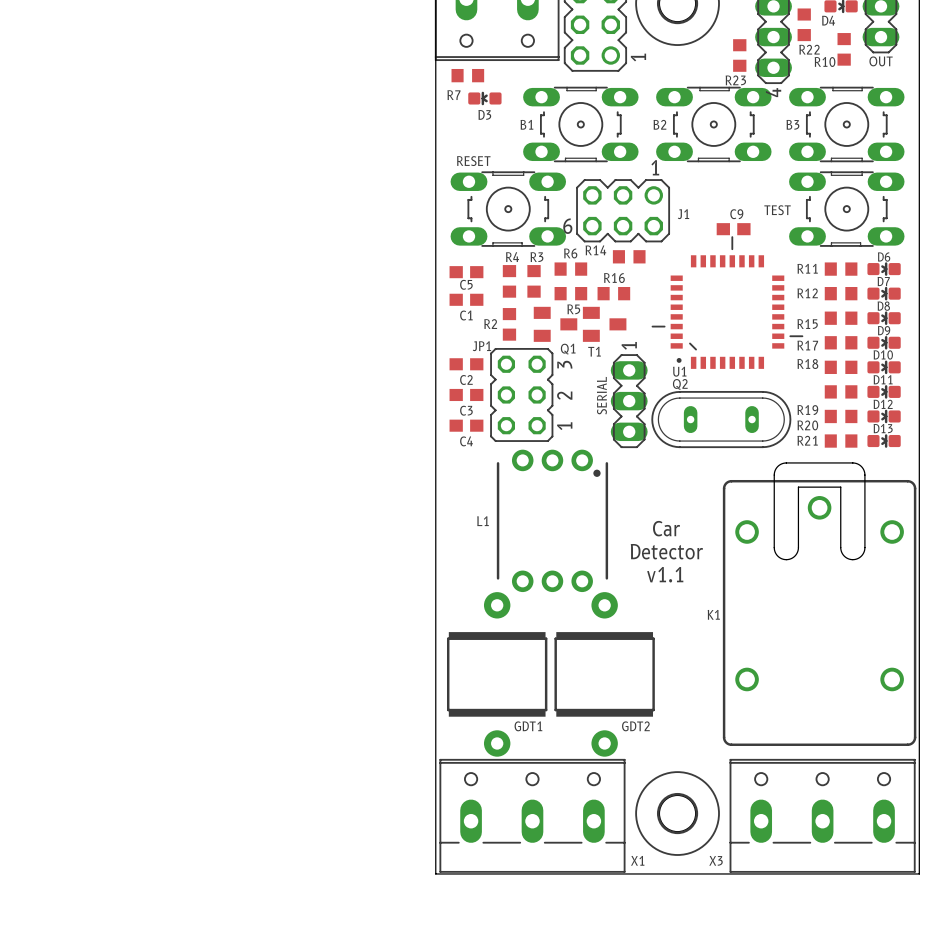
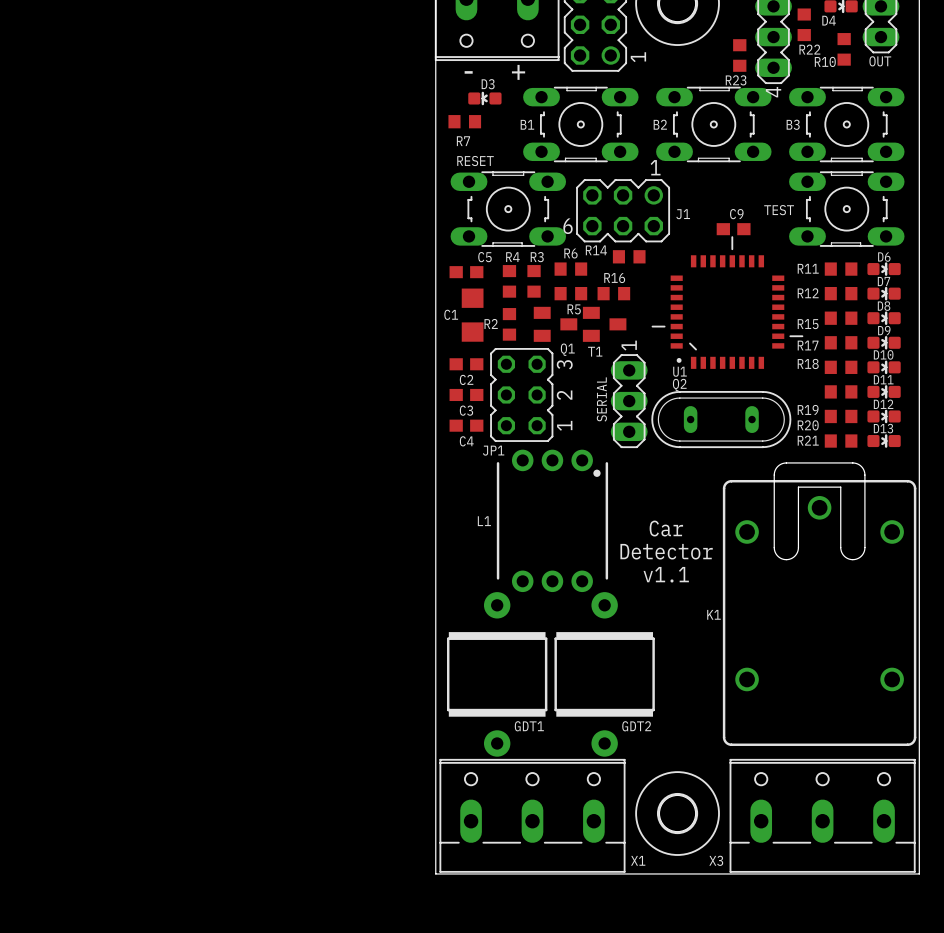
text: none -> - + (494, 72)
R7 position: (467, 75) -> (464, 121)
R7 name position: R7 (453, 95) -> R7 (463, 141)
D3 name position: D3 (484, 114) -> D3 (488, 84)
C5 name position: C5 (466, 284) -> C5 (484, 257)
C1 footprint: [449, 293, 484, 306] -> [461, 288, 484, 342]
JP1 name position: JP1 (481, 346) -> JP1 (493, 450)

